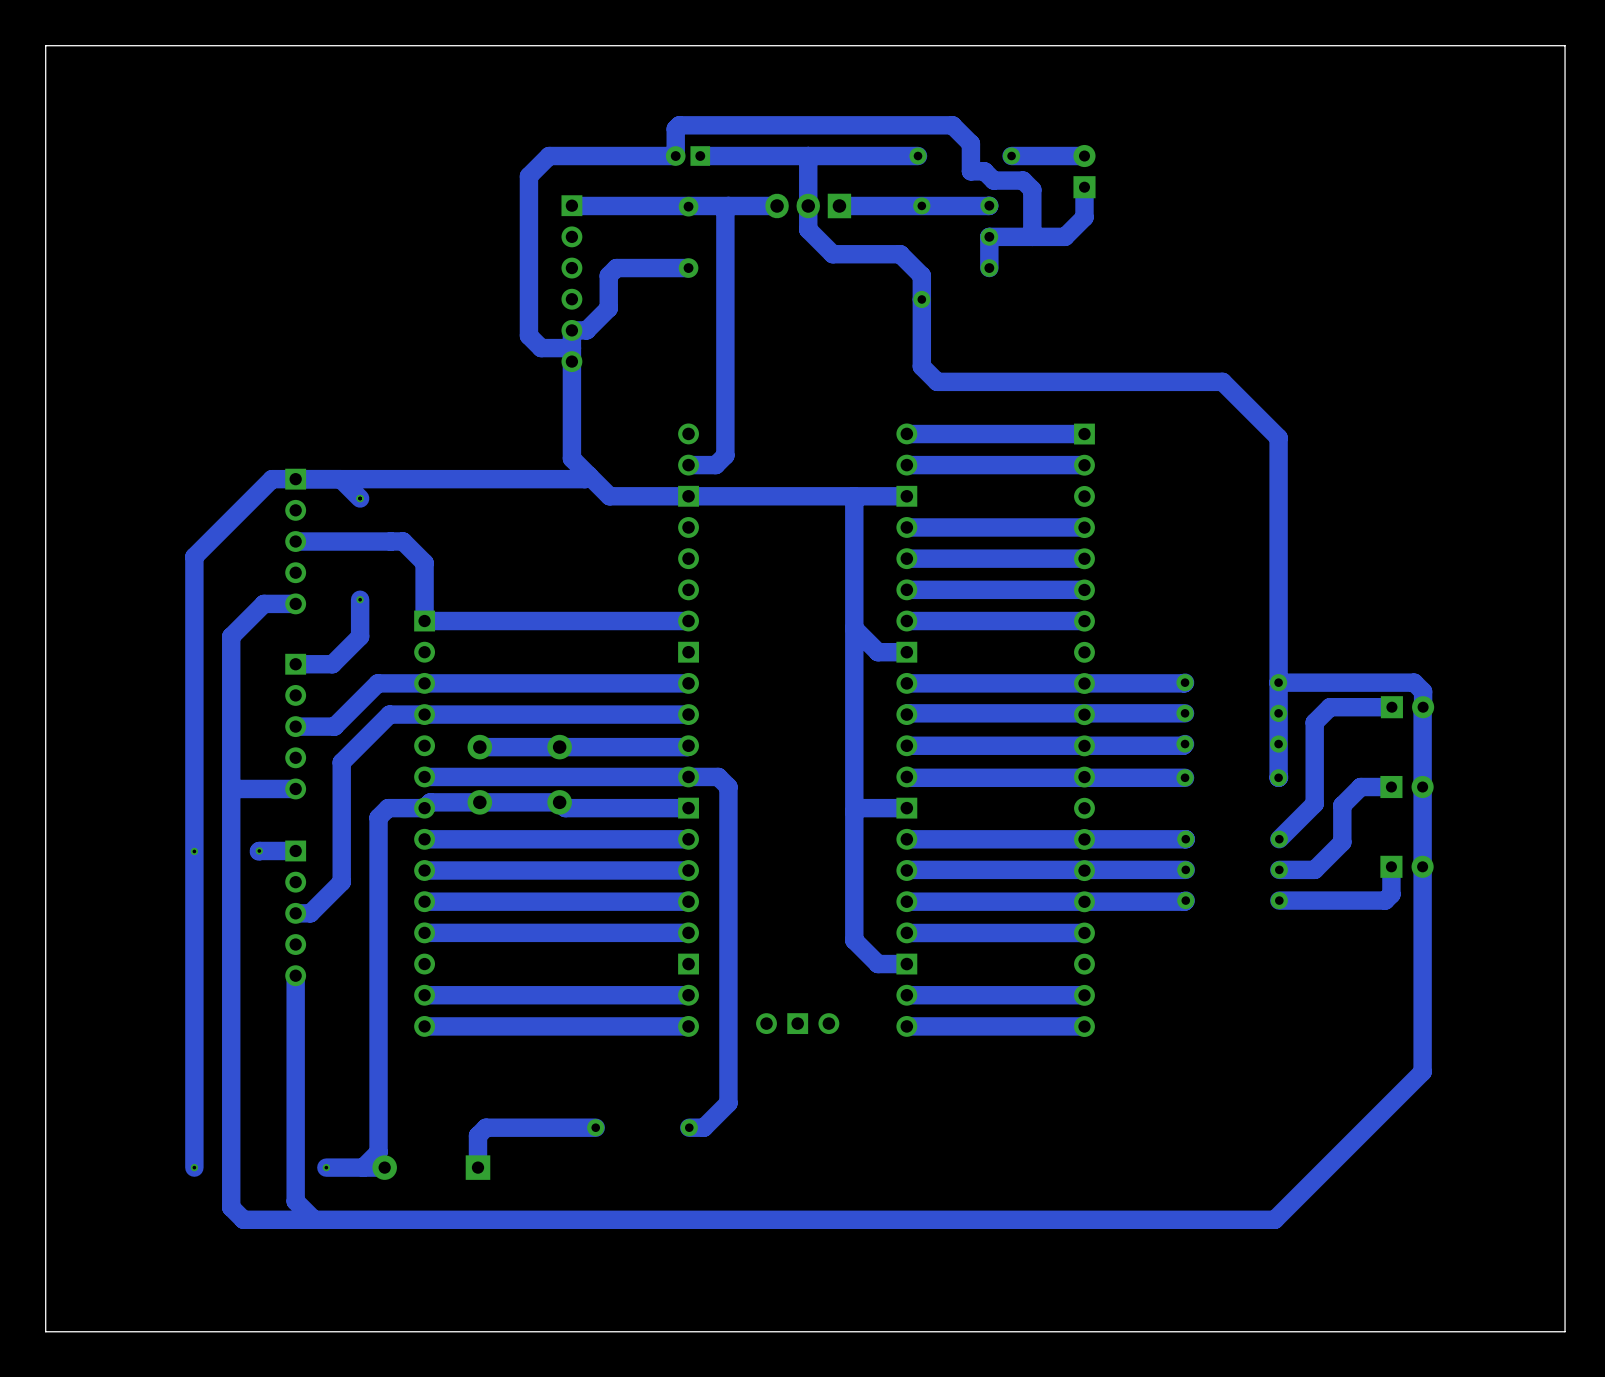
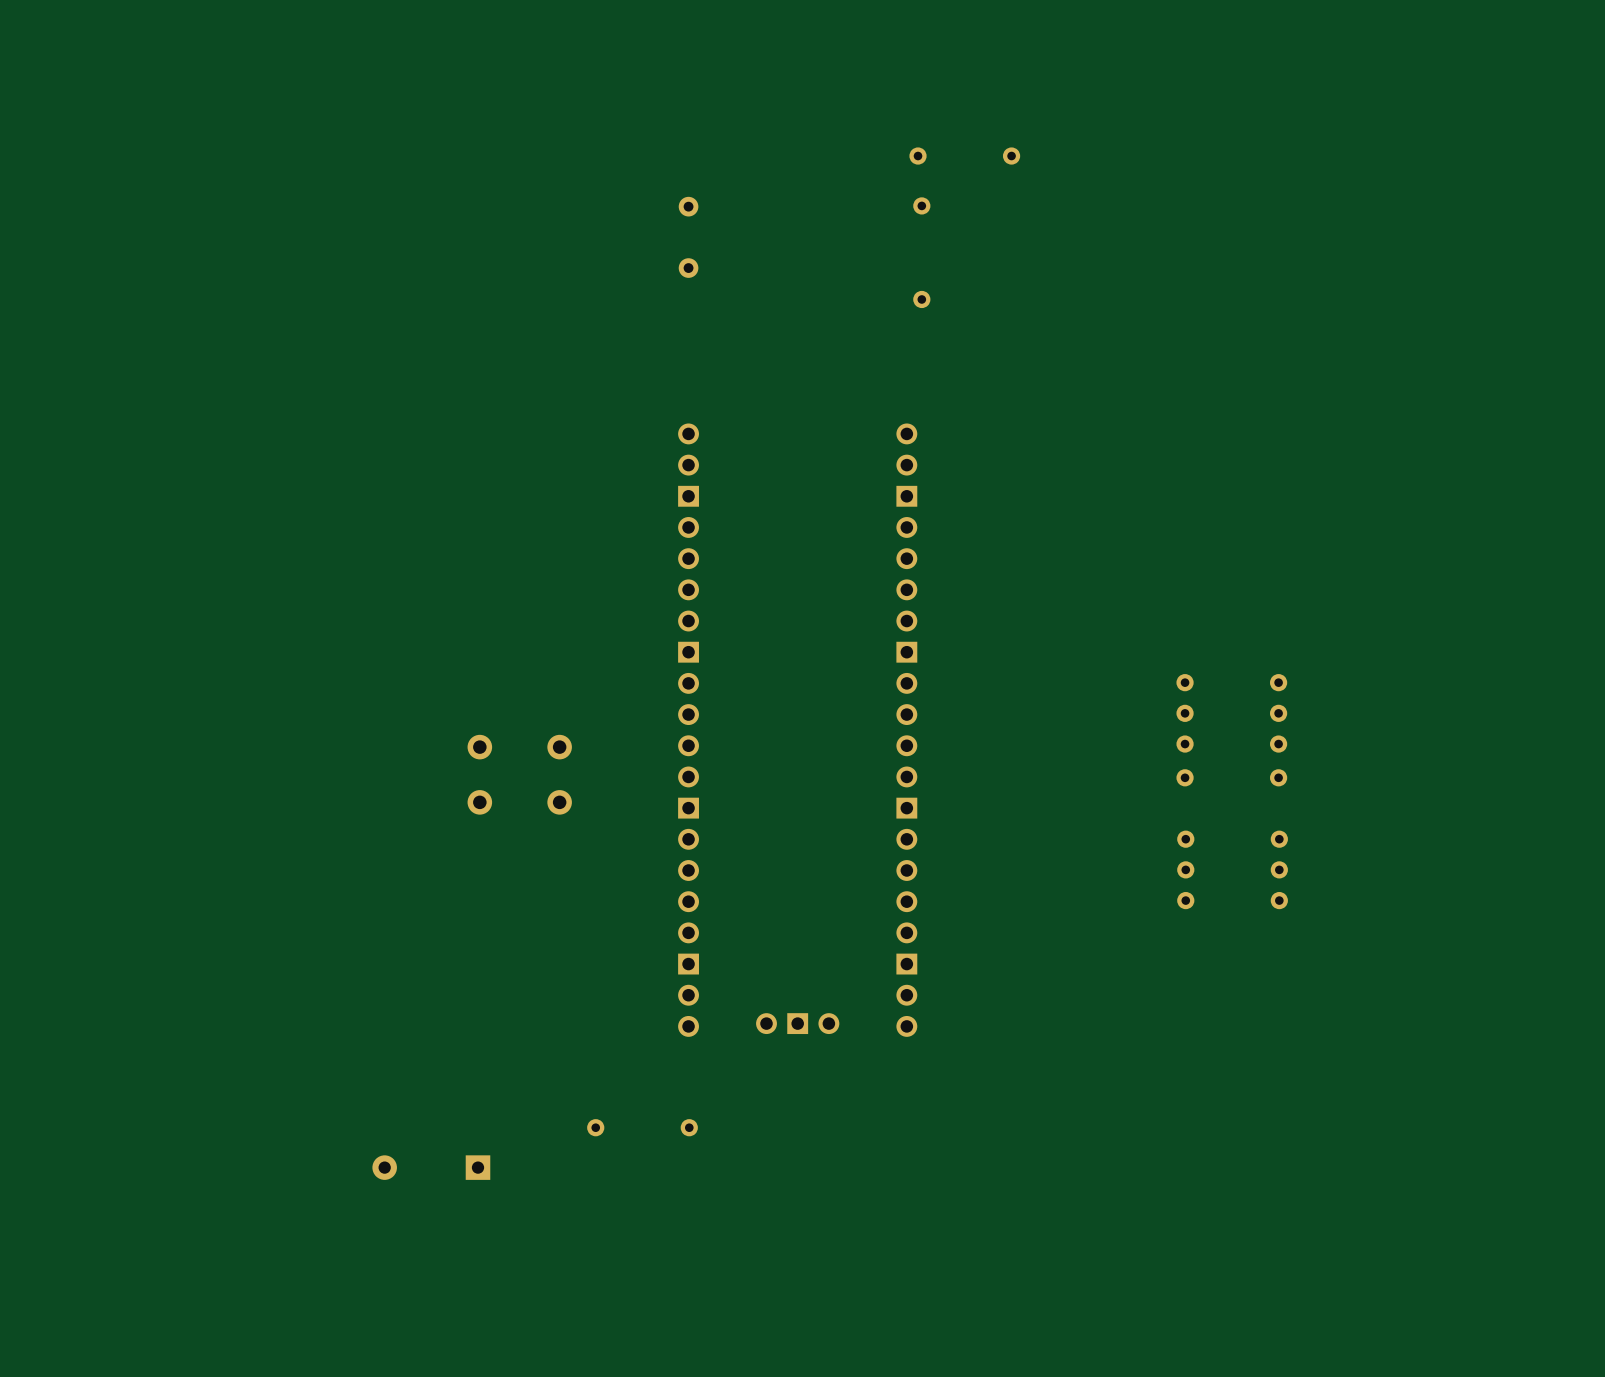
board edge: (1565, 45) (45, 45) (45, 1331) (1565, 1331) (1565, 45) -> none
part: (687, 156) -> none
track: (808, 156) (808, 229) (832, 254) (900, 254) (921, 275) (921, 366) (937, 381) (1222, 381) (1278, 437) (1279, 777) -> none
track: (918, 156) (700, 156) -> none
track: (1084, 156) (1011, 156) -> none
part: (1084, 171) -> none
track: (1084, 187) (1084, 217) (1065, 236) (989, 236) (989, 268) -> none
track: (728, 205) (725, 209) (725, 455) (715, 465) (688, 465) -> none
track: (776, 205) (571, 205) -> none
part: (808, 205) -> none
track: (989, 205) (839, 205) -> none
part: (989, 236) -> none
track: (1032, 236) (1032, 189) (1023, 180) (993, 180) (984, 171) (970, 171) (970, 143) (952, 125) (679, 125) (675, 128) (675, 156) (549, 156) (528, 176) (528, 335) (541, 348) (571, 348) -> none
track: (688, 268) (616, 268) (608, 275) (608, 308) (586, 330) (571, 330) (571, 458) (609, 496) (906, 496) -> none
part: (571, 283) -> none
track: (1084, 434) (906, 434) -> none
track: (1084, 465) (906, 465) -> none
track: (588, 475) (585, 479) (272, 479) (194, 556) (194, 1167) -> none
track: (340, 479) (360, 498) -> none
track: (854, 496) (854, 940) (877, 964) (906, 964) -> none
via: (360, 498) -> none
track: (1084, 527) (906, 527) -> none
part: (295, 541) -> none
track: (390, 541) (403, 541) (424, 562) (424, 621) (688, 621) -> none
track: (390, 541) (295, 541) -> none
track: (1084, 558) (906, 558) -> none
track: (1084, 589) (906, 589) -> none
track: (360, 599) (360, 636) (332, 664) (295, 664) -> none
via: (360, 599) -> none
track: (295, 603) (263, 603) (231, 636) (231, 1207) (243, 1219) (1274, 1219) (1422, 1071) (1423, 691) (1414, 682) (1278, 682) -> none
track: (1084, 621) (906, 621) -> none
track: (854, 628) (877, 652) (906, 652) -> none
track: (1185, 682) (906, 683) -> none
track: (688, 683) (377, 683) (334, 726) (295, 726) -> none
track: (1391, 707) (1330, 707) (1314, 722) (1314, 803) (1279, 839) -> none
part: (1407, 707) -> none
track: (1185, 713) (906, 714) -> none
track: (688, 714) (389, 714) (341, 762) (341, 882) (310, 913) (295, 913) -> none
part: (295, 726) -> none
part: (1084, 730) -> none
track: (1185, 744) (1183, 745) (906, 745) -> none
track: (688, 745) (479, 747) (481, 745) -> none
track: (424, 776) (718, 776) (728, 787) (728, 1103) (703, 1127) (689, 1127) -> none
track: (906, 776) (1185, 777) -> none
track: (231, 787) (233, 788) (295, 788) -> none
track: (1391, 787) (1360, 787) (1342, 805) (1342, 842) (1314, 869) (1279, 869) -> none
part: (1407, 787) -> none
track: (688, 808) (565, 808) (559, 802) (430, 802) (424, 808) (388, 808) (378, 817) (378, 1152) (363, 1167) -> none
track: (906, 808) (857, 808) (854, 811) -> none
part: (424, 823) -> none
track: (688, 839) (424, 839) -> none
track: (1185, 839) (906, 839) -> none
via: (259, 850) -> none
track: (295, 850) (258, 851) -> none
via: (194, 851) -> none
track: (1391, 866) (1391, 894) (1385, 900) (1279, 900) -> none
part: (1407, 866) -> none
track: (1185, 869) (906, 870) -> none
track: (688, 870) (424, 870) -> none
track: (1185, 900) (906, 901) -> none
track: (688, 901) (424, 901) -> none
part: (295, 913) -> none
track: (688, 932) (424, 932) -> none
track: (1084, 932) (906, 932) -> none
track: (295, 975) (295, 1201) (314, 1219) -> none
track: (688, 995) (424, 995) -> none
track: (1084, 995) (906, 995) -> none
track: (688, 1026) (424, 1026) -> none
track: (1084, 1026) (906, 1026) -> none
track: (595, 1127) (485, 1127) (477, 1135) (477, 1167) -> none
via: (194, 1167) -> none
via: (326, 1167) -> none
track: (384, 1167) (326, 1167) -> none

